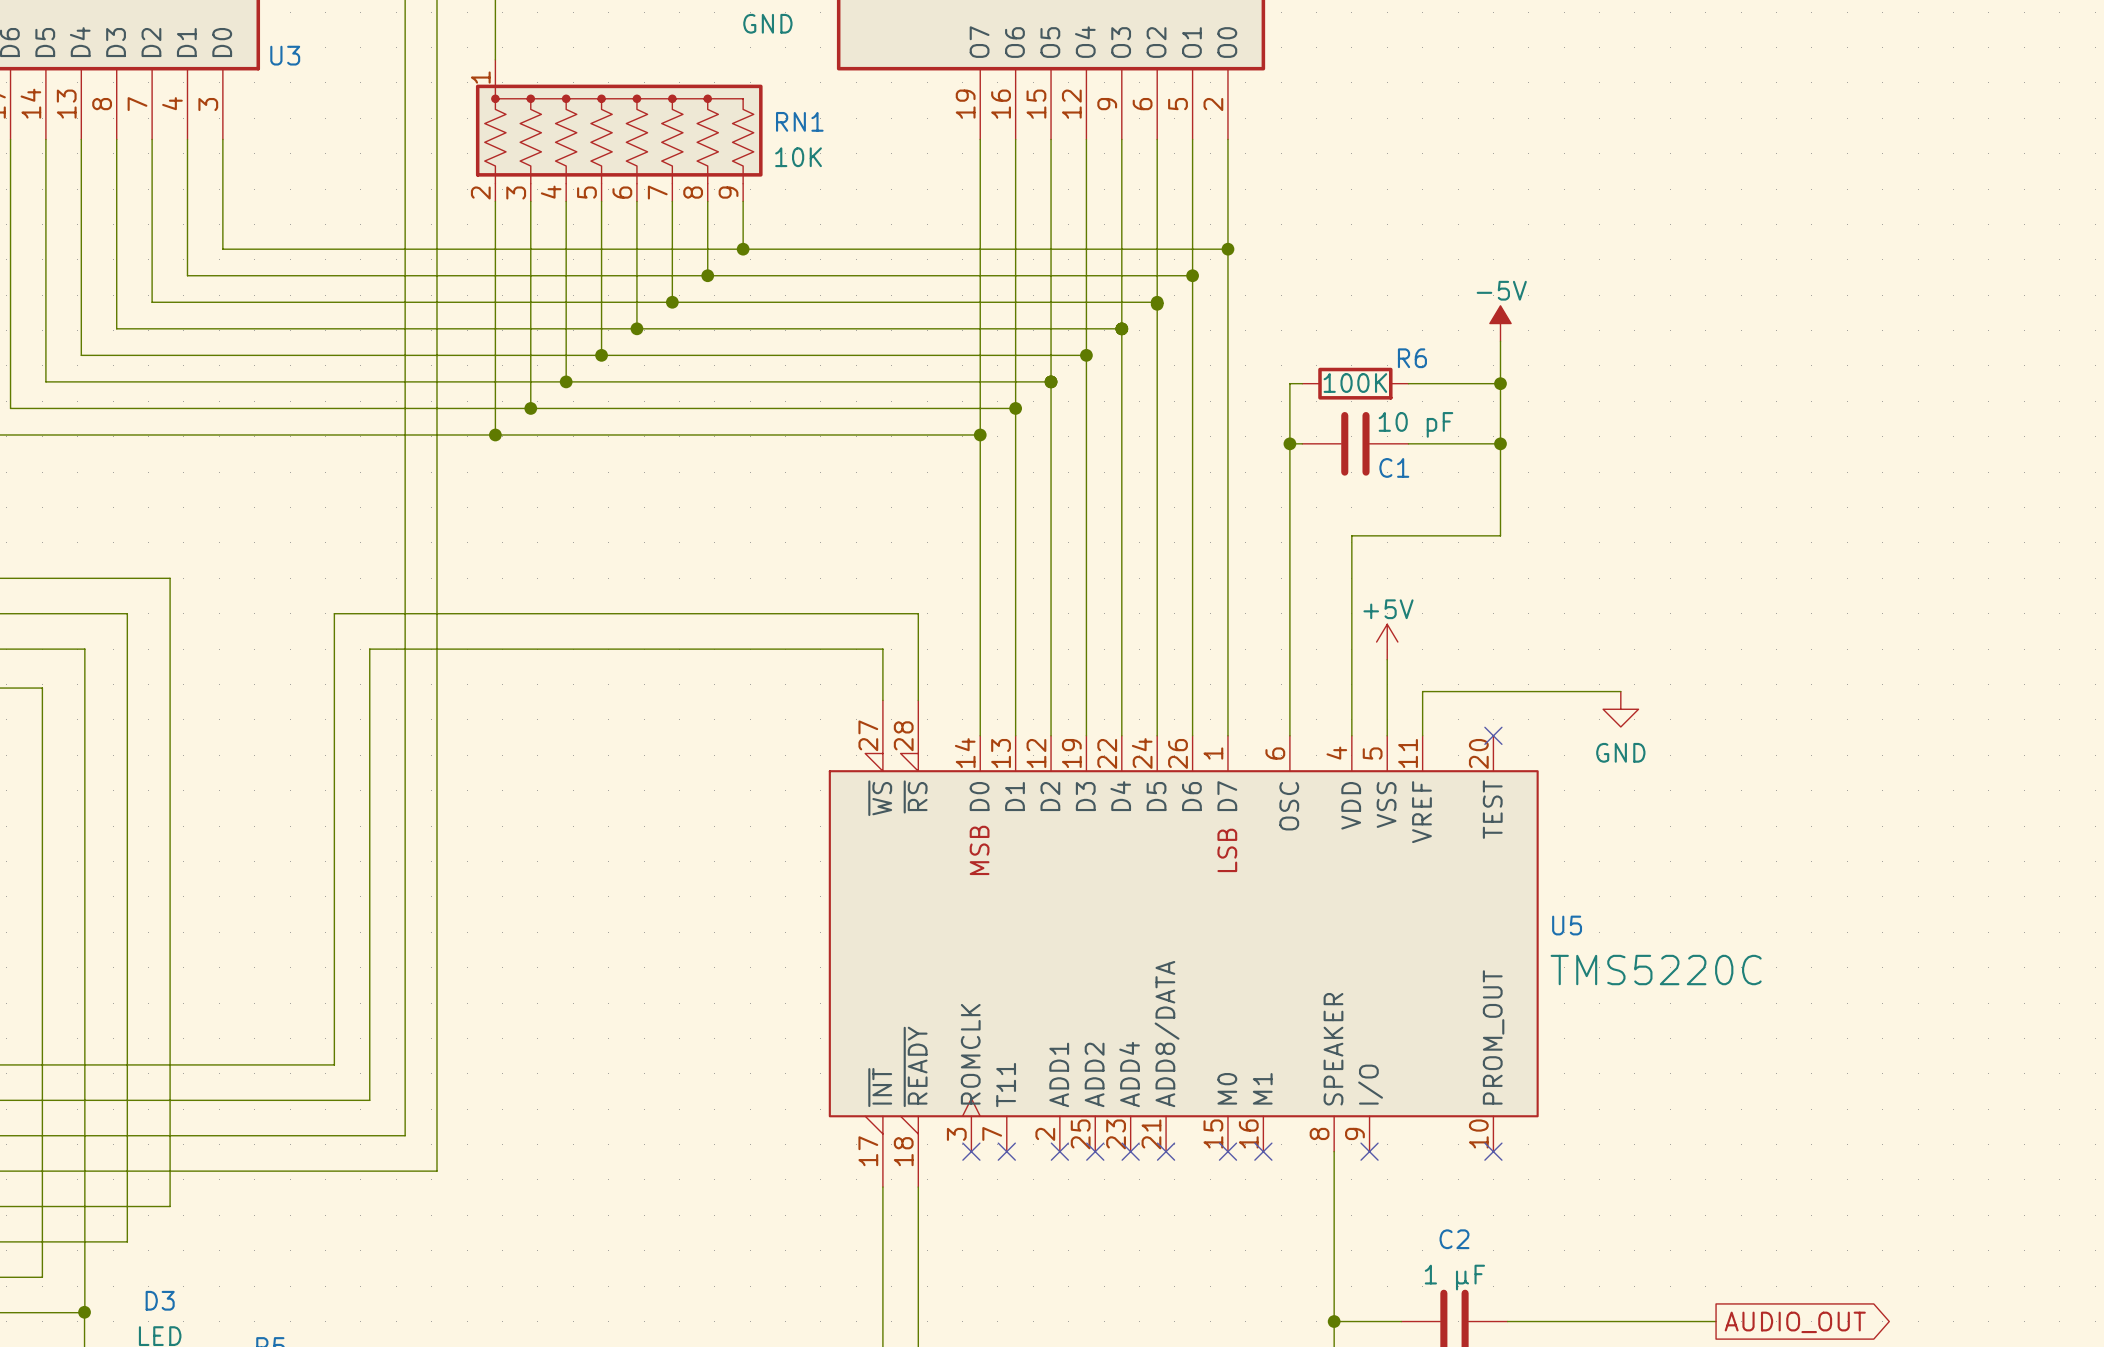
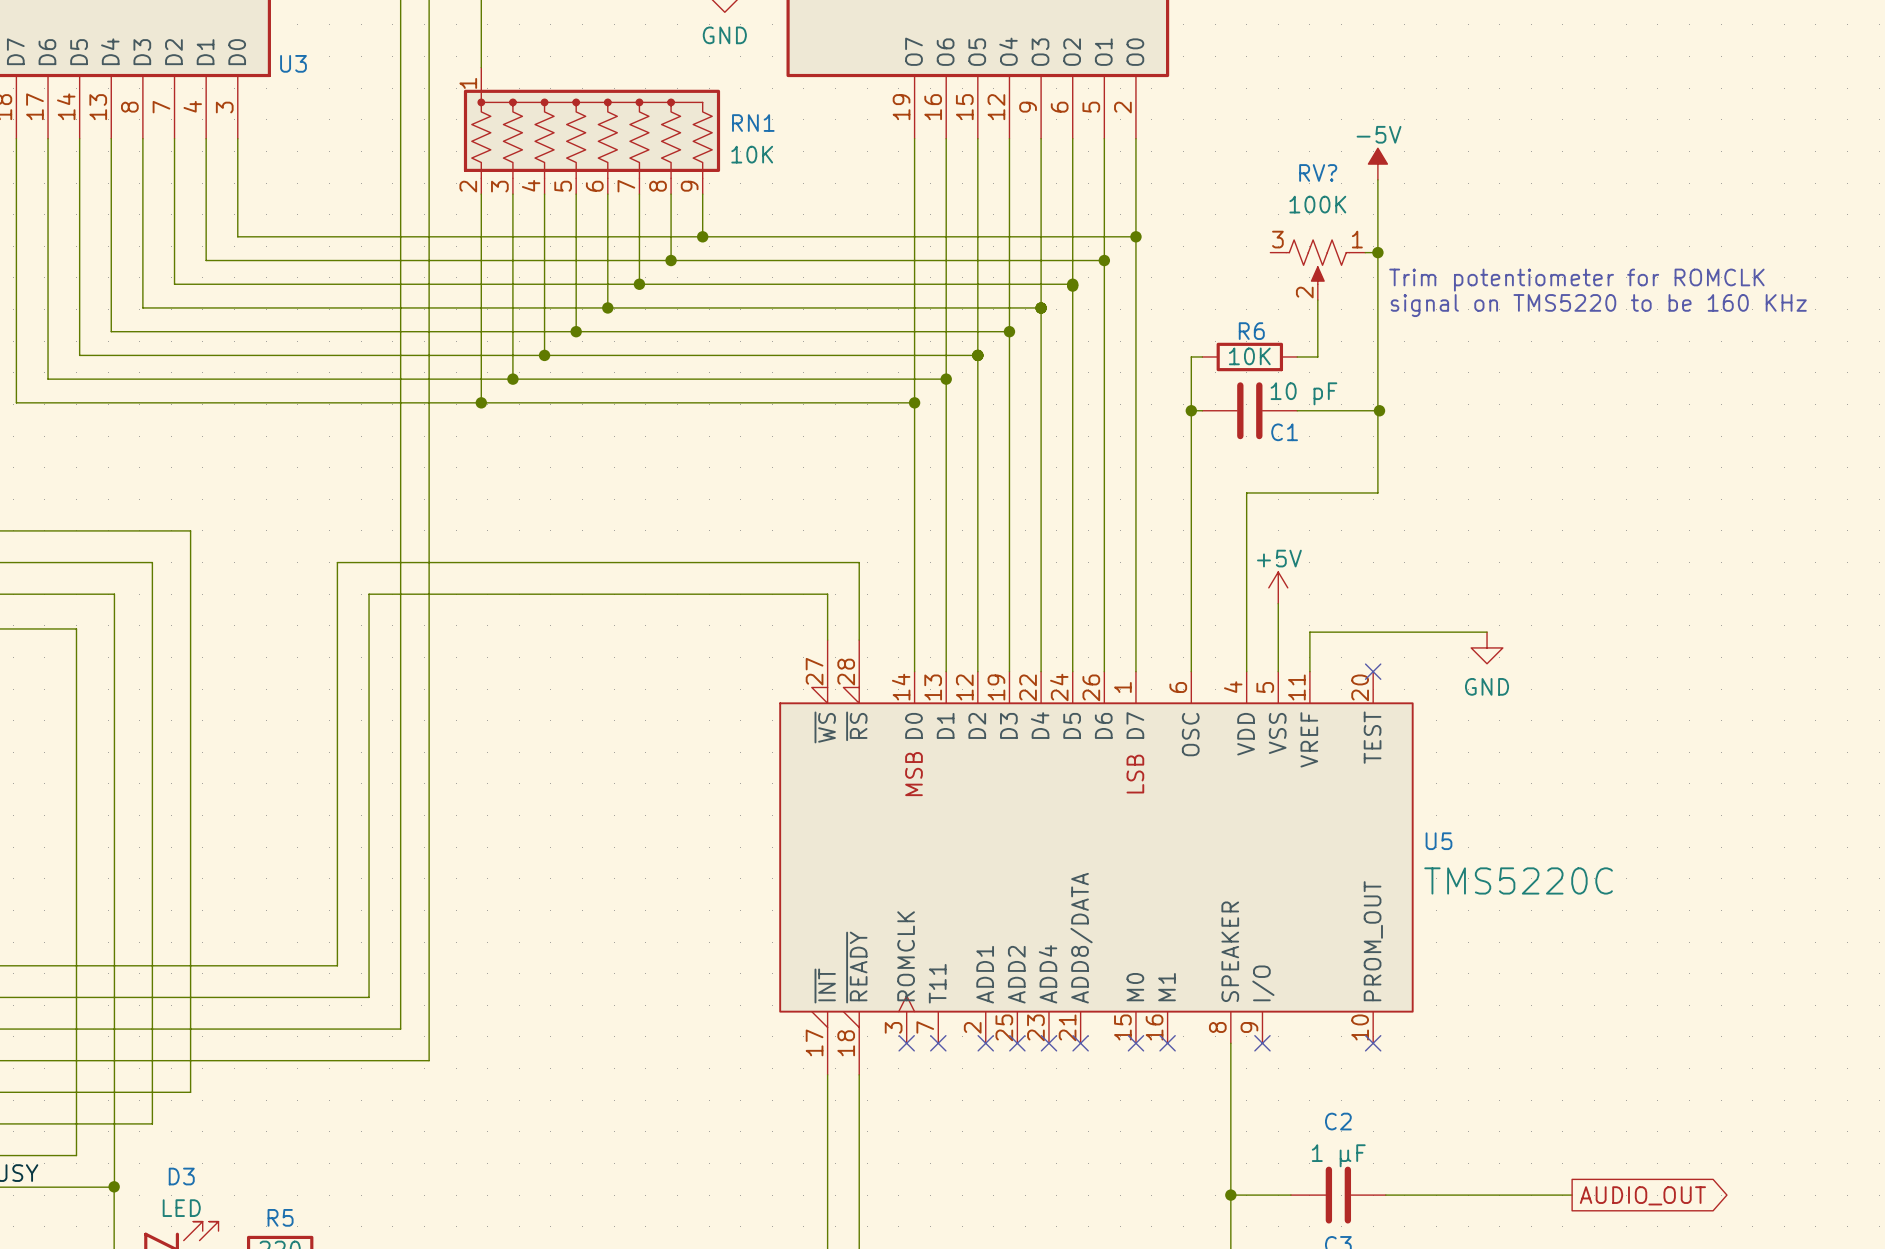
wire: none -> (1365, 252) (1377, 252)
junction: none -> (1377, 252)
RV?: none -> 100K (1317, 270)
text: none -> Trim potentiometer for ROMCLK (1576, 280)
power symbol position: -5V (1500, 323) -> -5V (1377, 164)
text: none -> signal on TMS5220 to be 160 KHz (1598, 305)
wire: (1500, 341) (1500, 535) (1498, 535) -> (1377, 179) (1377, 492)
R6 name position: R6 (1412, 358) -> R6 (1251, 331)
R6 value: 100K (1355, 383) -> 10K (1249, 356)
wire: (1431, 383) (1500, 383) -> (1317, 356) (1317, 300)
junction: (1500, 383) -> none

